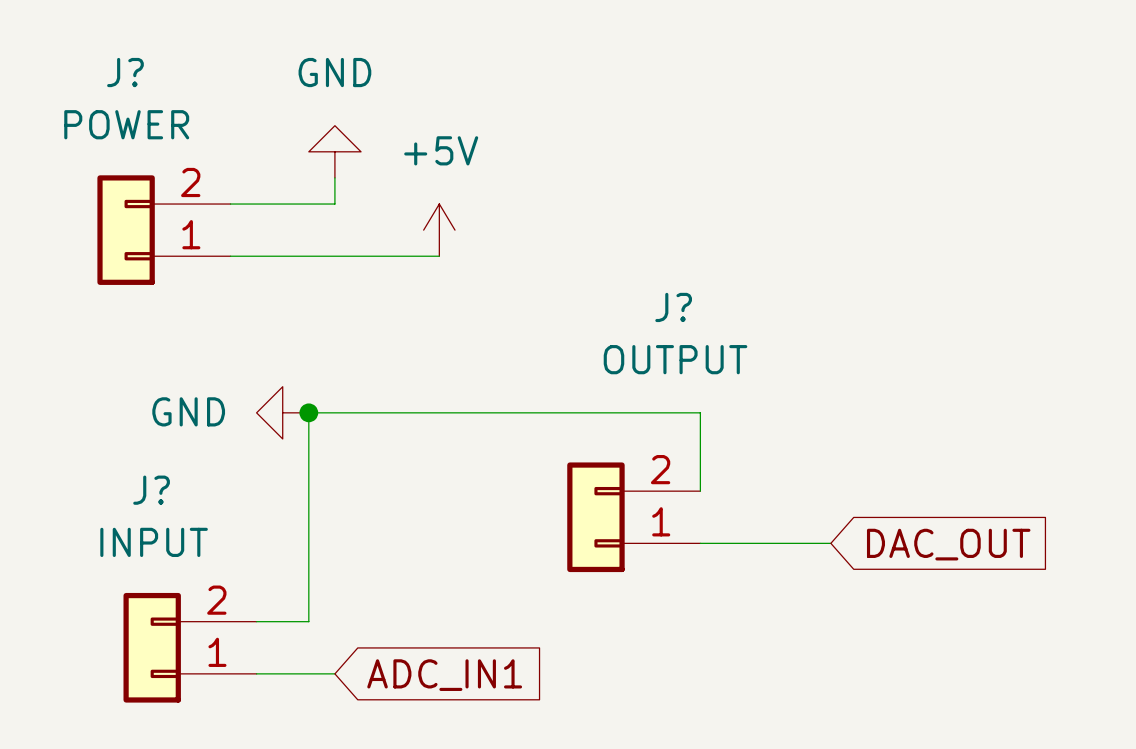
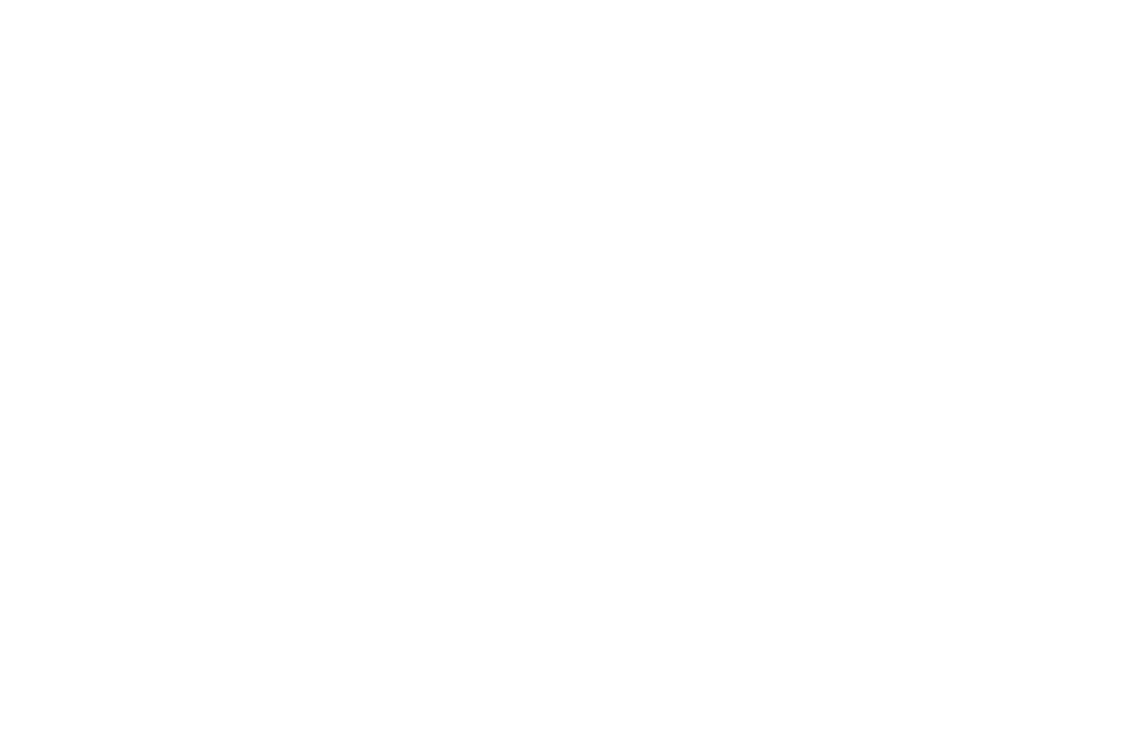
power symbol: GND (334, 151) -> none
wire: (334, 177) (334, 204) (230, 204) -> none
J?: POWER (163, 230) -> none
power symbol: +5V (439, 230) -> none
wire: (230, 256) (439, 256) -> none
power symbol: GND (282, 412) -> none
junction: (308, 412) -> none
wire: (700, 491) (700, 412) (308, 412) (308, 621) (256, 621) -> none
J?: OUTPUT (633, 517) -> none
wire: (700, 543) (830, 543) -> none
global label: DAC_OUT (948, 544) -> none
J?: INPUT (190, 647) -> none
wire: (256, 673) (334, 673) -> none
global label: ADC_IN1 (444, 675) -> none

